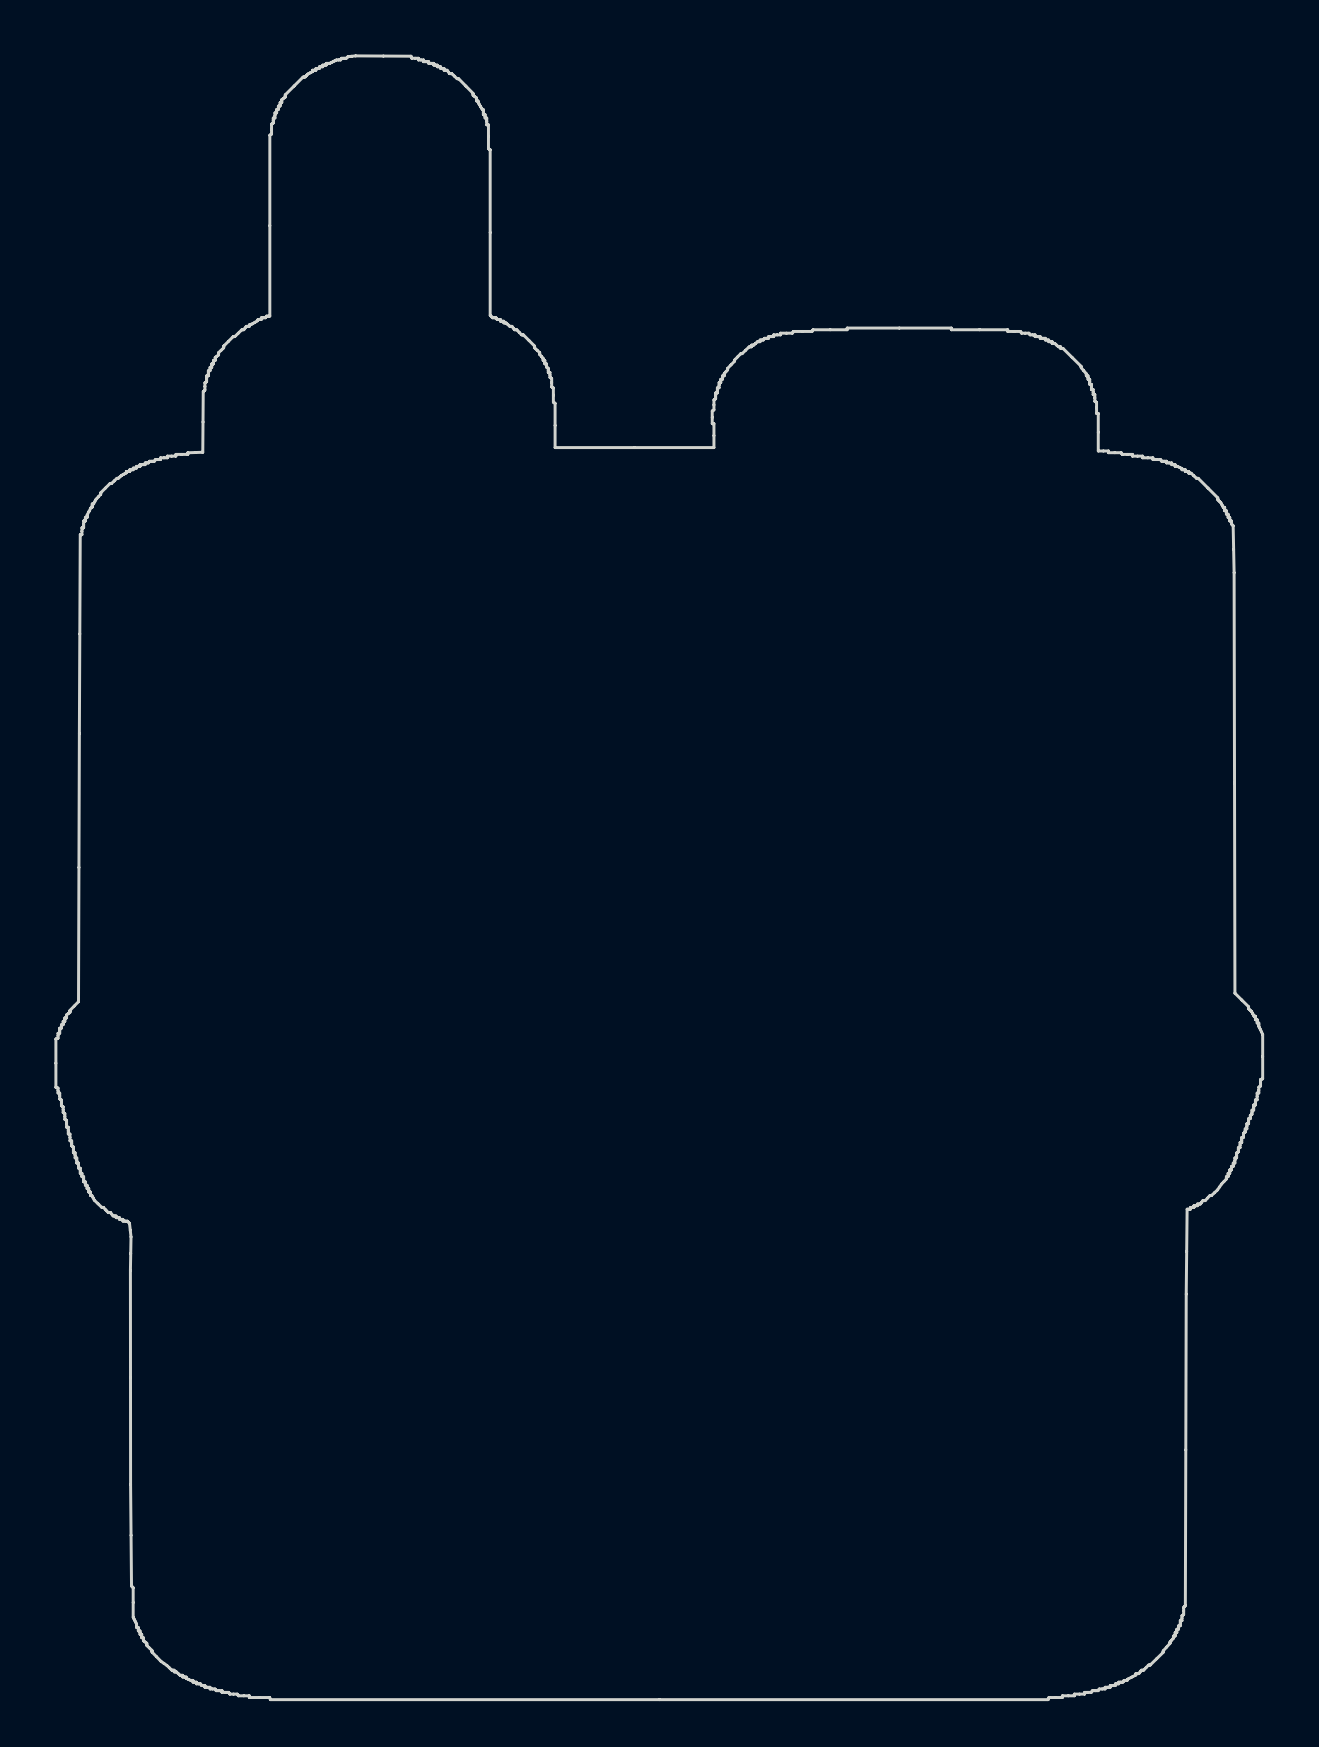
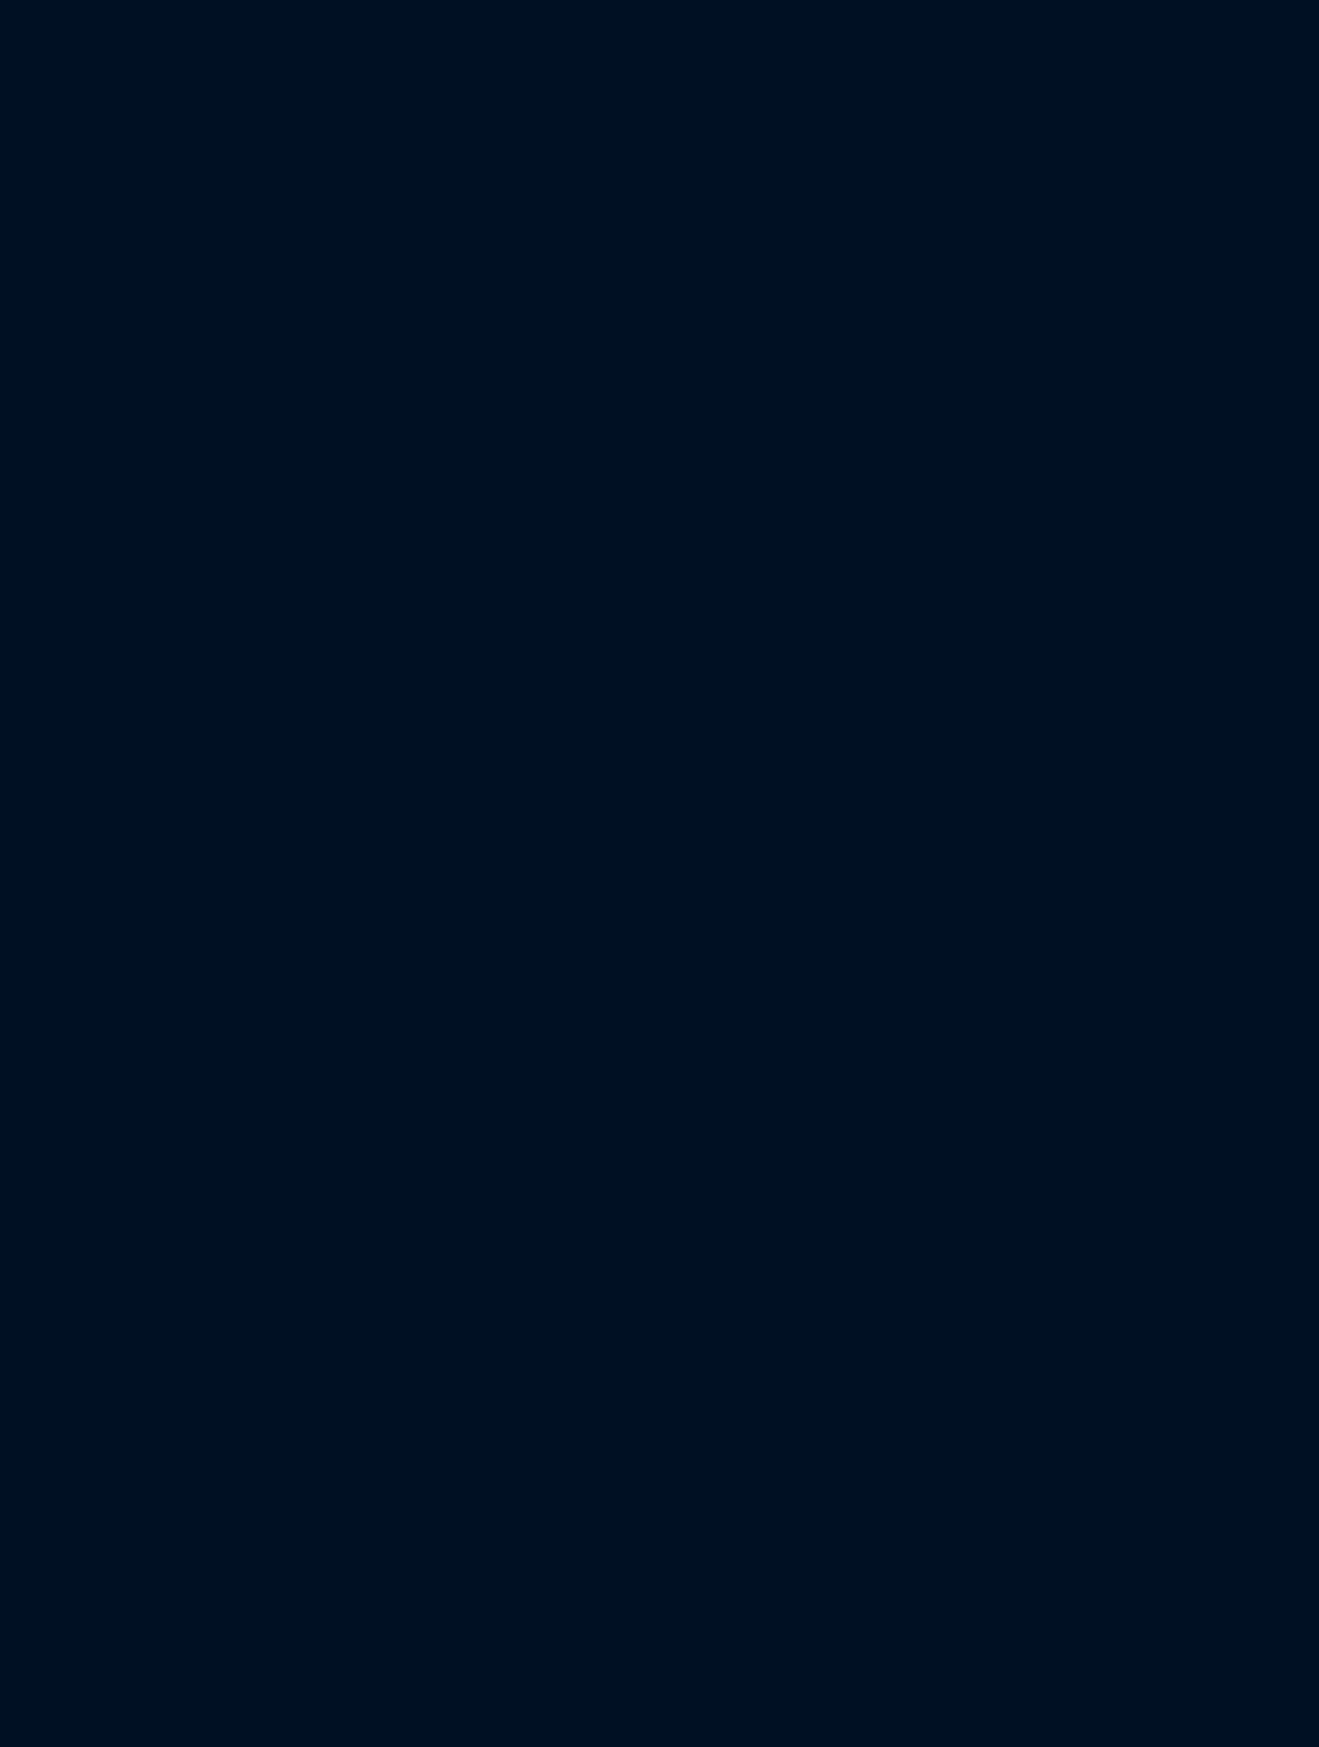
board edge: (355, 55) (411, 56) (411, 58) (418, 58) (423, 61) (428, 61) (428, 63) (433, 63) (458, 78) (473, 93) (483, 109) (486, 124) (488, 124) (488, 148) (490, 149) (490, 315) (503, 321) (523, 334) (534, 346) (546, 363) (551, 378) (553, 402) (555, 403) (555, 447) (713, 447) (712, 410) (715, 392) (717, 392) (722, 375) (734, 360) (749, 346) (760, 340) (773, 336) (773, 334) (792, 333) (793, 331) (812, 331) (813, 329) (847, 329) (847, 328) (1007, 329) (1007, 331) (1020, 331) (1045, 338) (1063, 348) (1081, 366) (1089, 379) (1096, 402) (1098, 450) (1160, 459) (1188, 471) (1217, 497) (1231, 521) (1234, 572) (1234, 993) (1255, 1016) (1262, 1034) (1262, 1078) (1260, 1079) (1253, 1110) (1248, 1118) (1246, 1128) (1245, 1128) (1236, 1157) (1234, 1157) (1234, 1163) (1228, 1173) (1228, 1176) (1205, 1200) (1187, 1209) (1185, 1605) (1180, 1625) (1163, 1652) (1143, 1670) (1127, 1680) (1110, 1685) (1110, 1687) (1105, 1687) (1105, 1688) (1084, 1692) (1084, 1694) (1048, 1697) (1048, 1699) (270, 1699) (269, 1697) (249, 1697) (249, 1695) (222, 1692) (222, 1690) (204, 1687) (204, 1685) (182, 1677) (171, 1670) (151, 1652) (136, 1627) (133, 1617) (133, 1587) (131, 1586) (129, 1223) (108, 1212) (90, 1195) (87, 1185) (83, 1181) (83, 1176) (80, 1173) (75, 1152) (73, 1152) (59, 1093) (55, 1087) (55, 1038) (58, 1038) (59, 1028) (61, 1028) (66, 1014) (78, 1001) (80, 534) (81, 534) (81, 527) (83, 527) (83, 521) (87, 517) (92, 503) (110, 483) (126, 471) (149, 461) (160, 459) (160, 457) (202, 452) (203, 391) (208, 370) (218, 352) (233, 336) (258, 319) (269, 316) (269, 135) (274, 112) (285, 94) (312, 70) (336, 59) (355, 55) -> none

